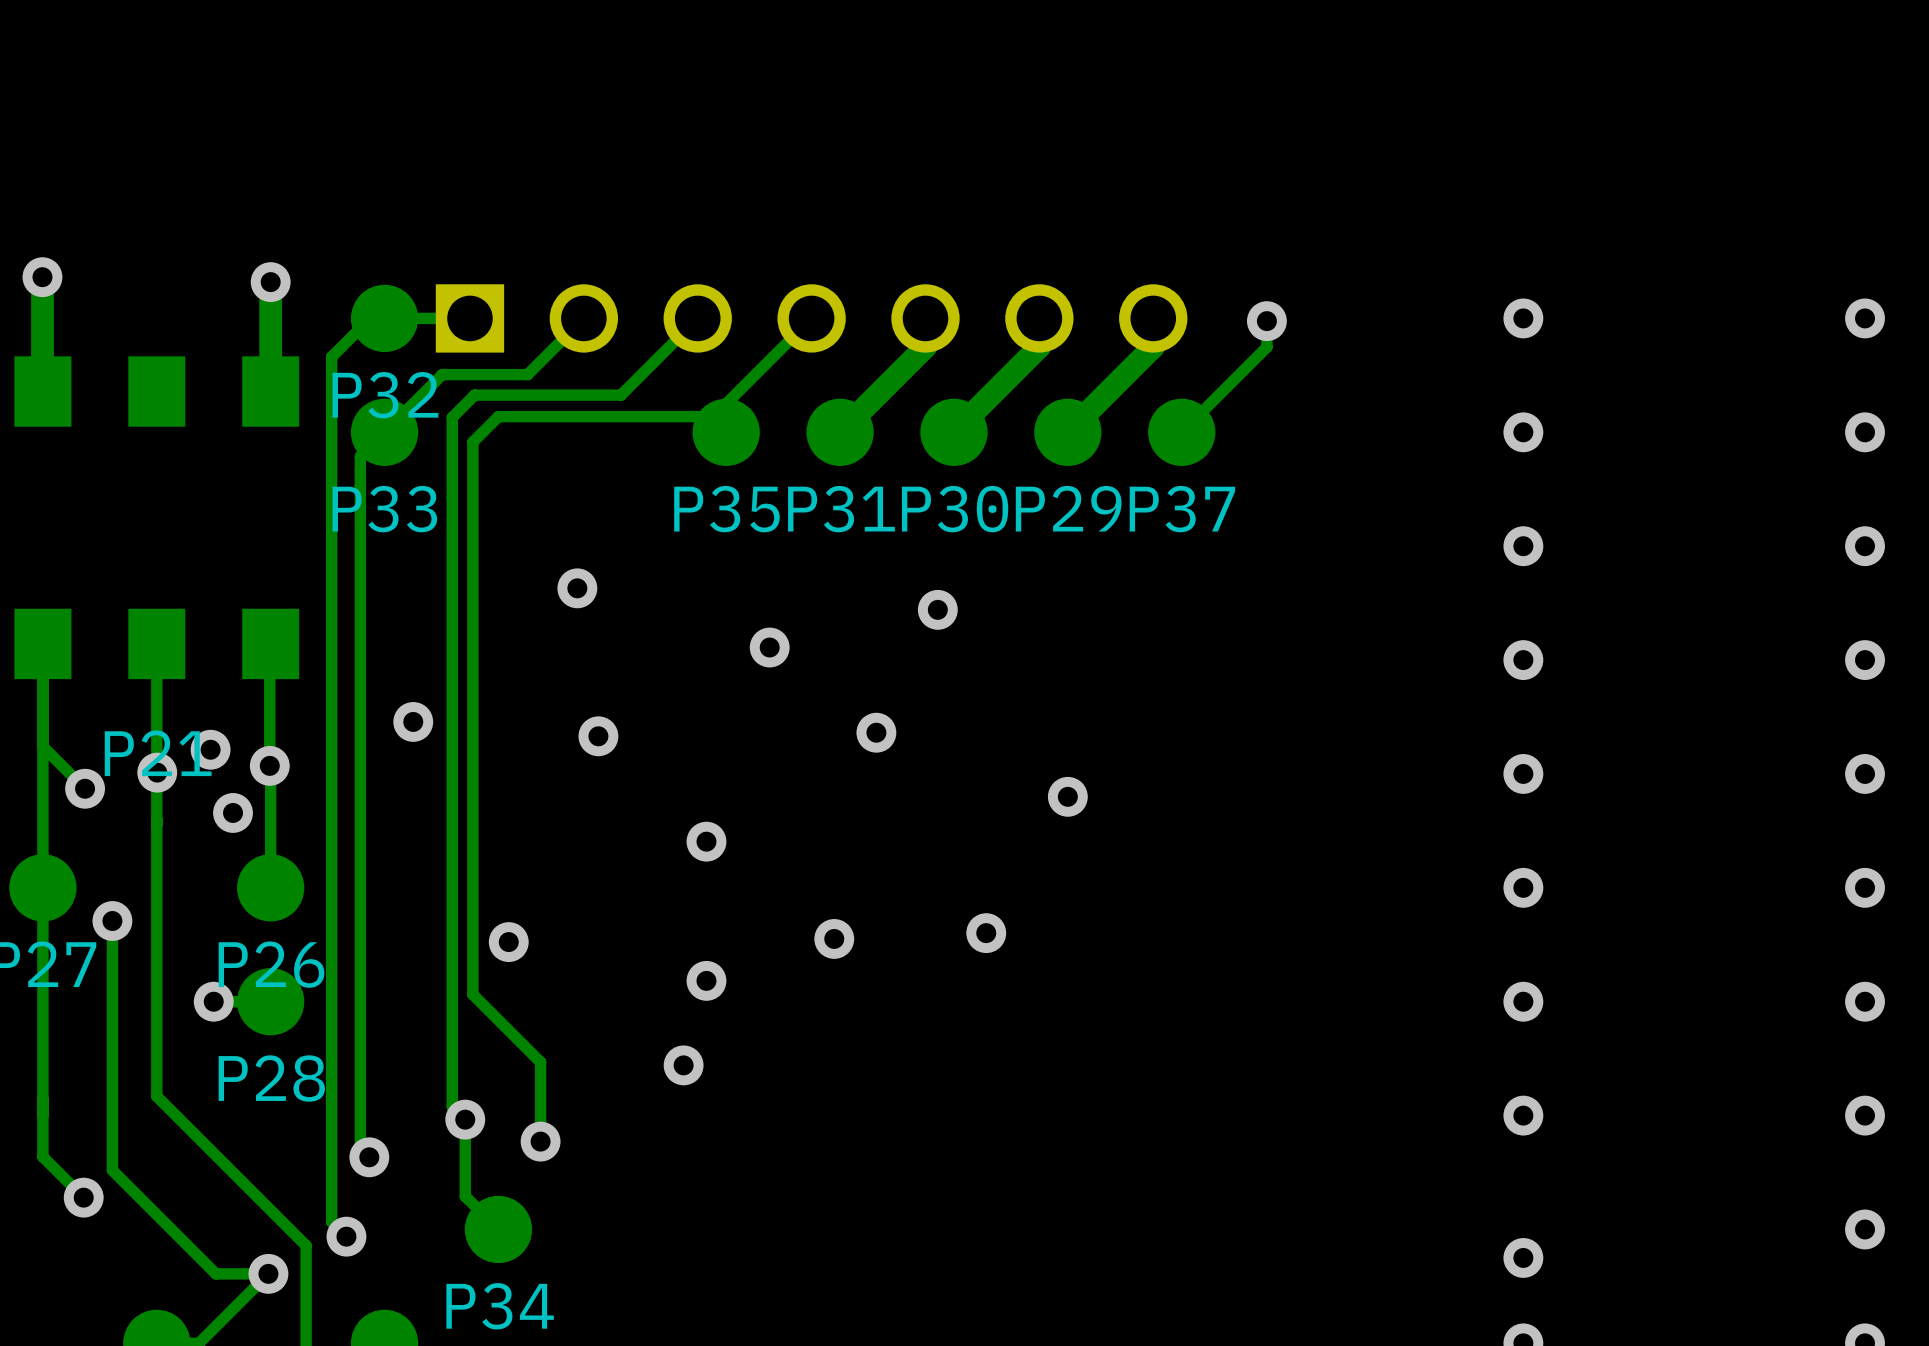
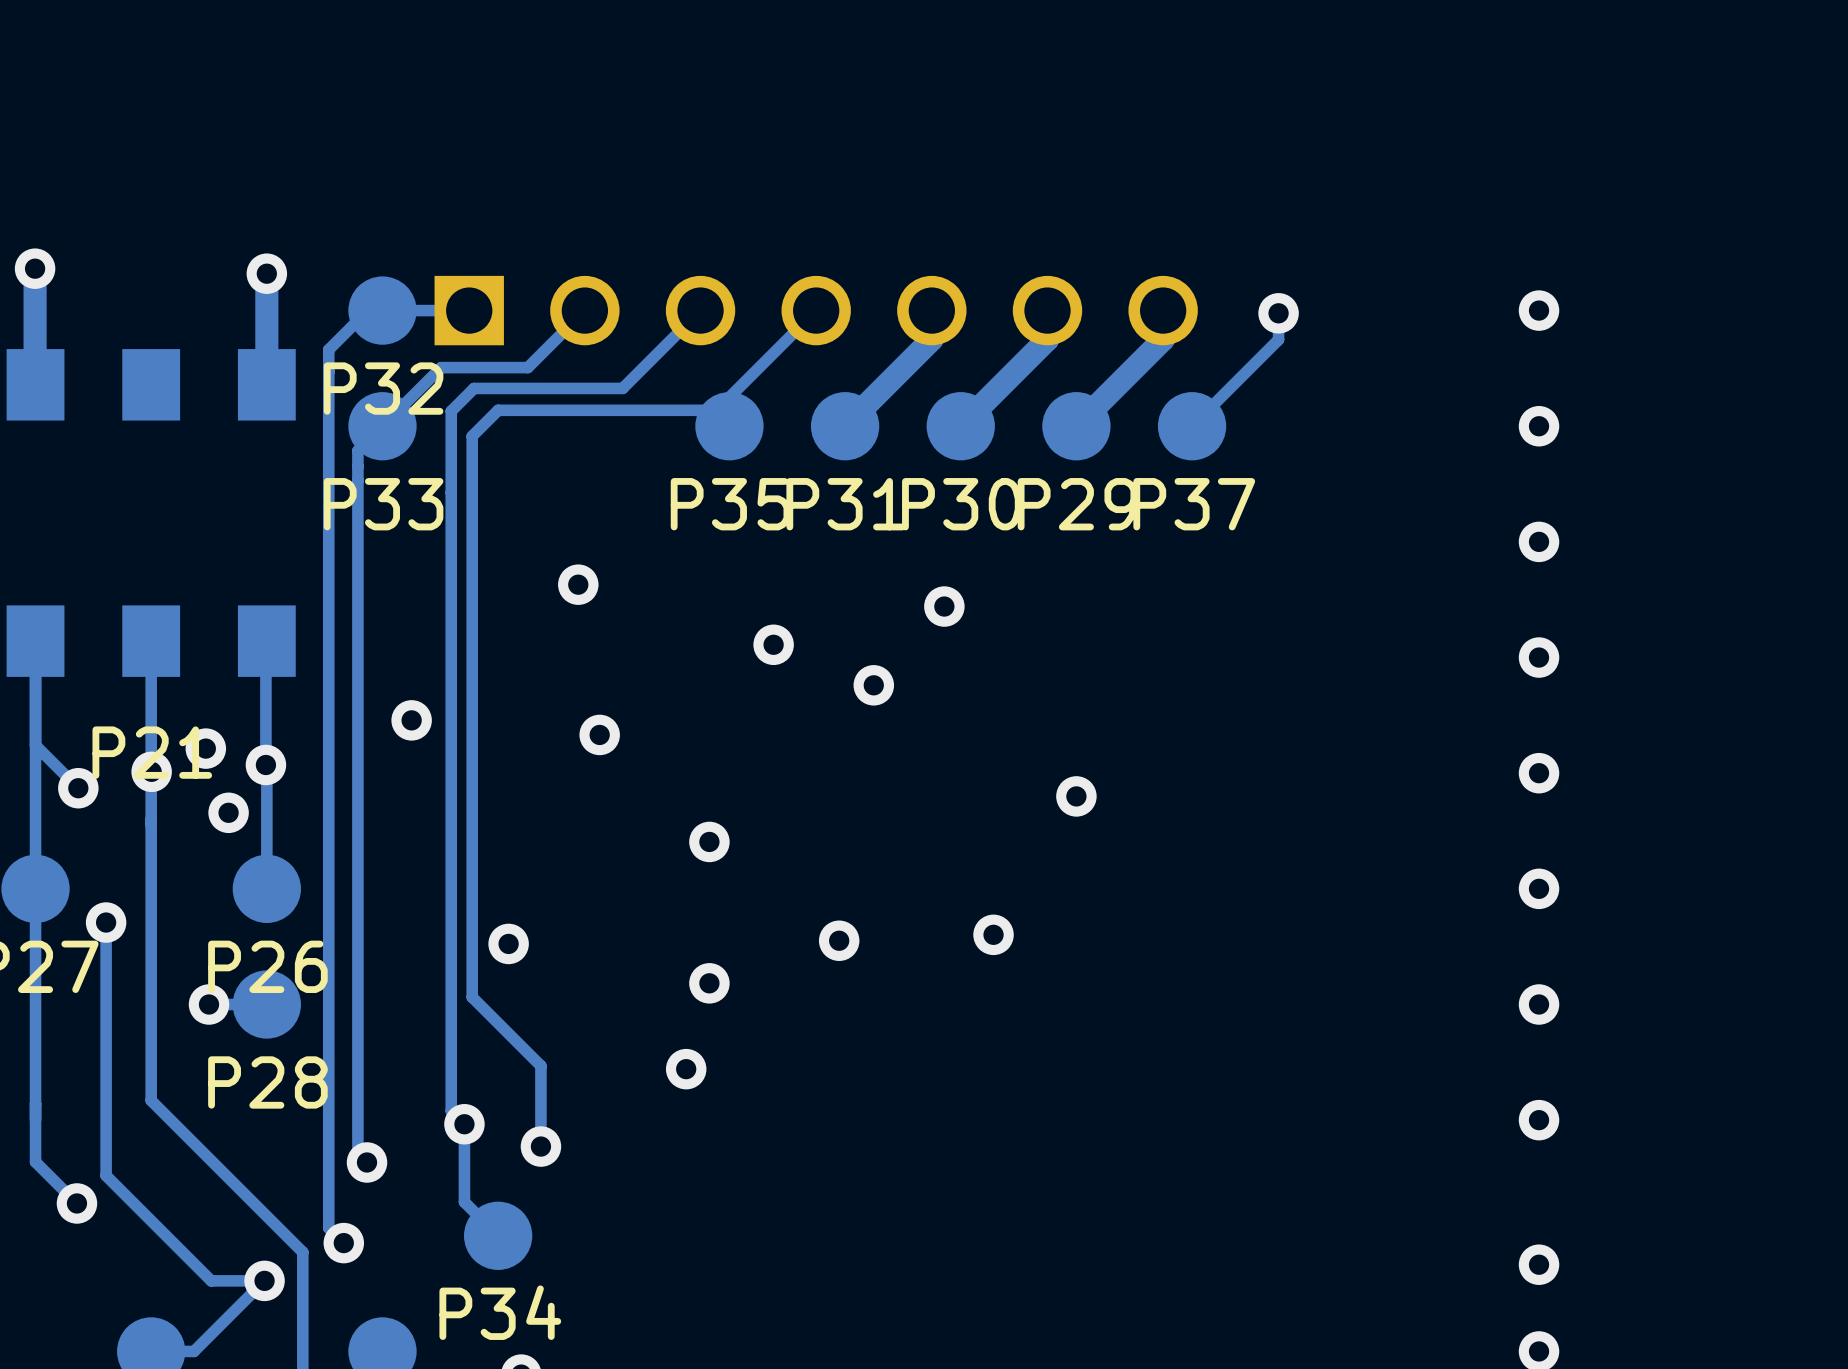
via position: (876, 732) -> (873, 685)

